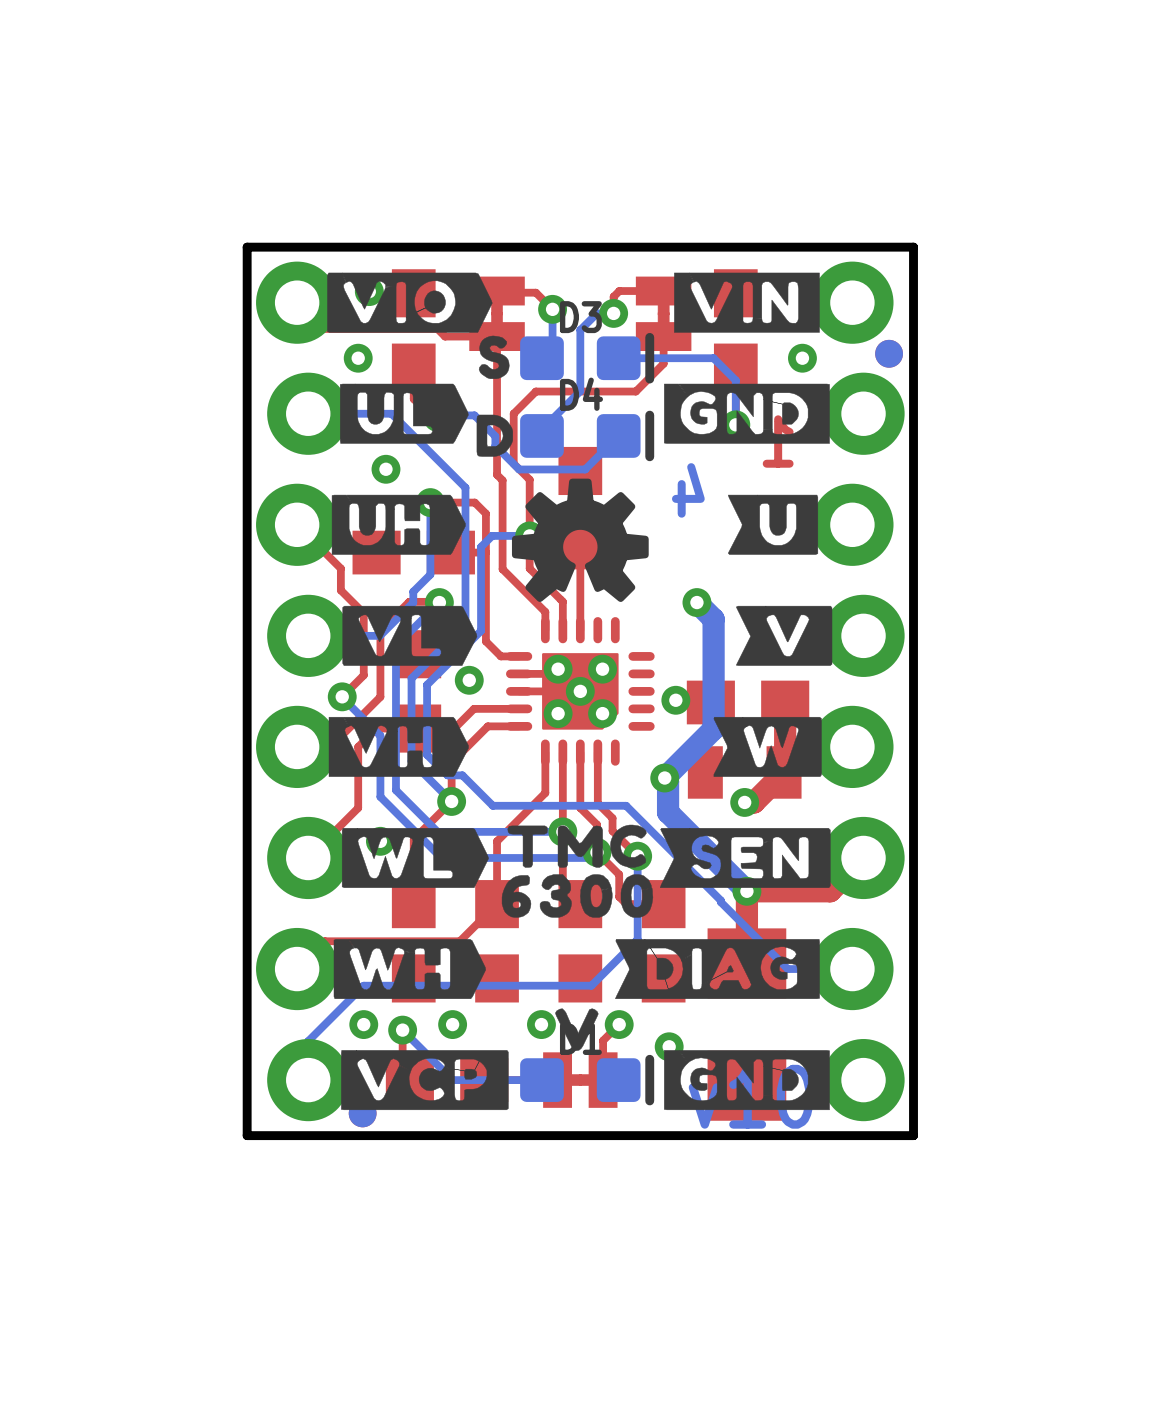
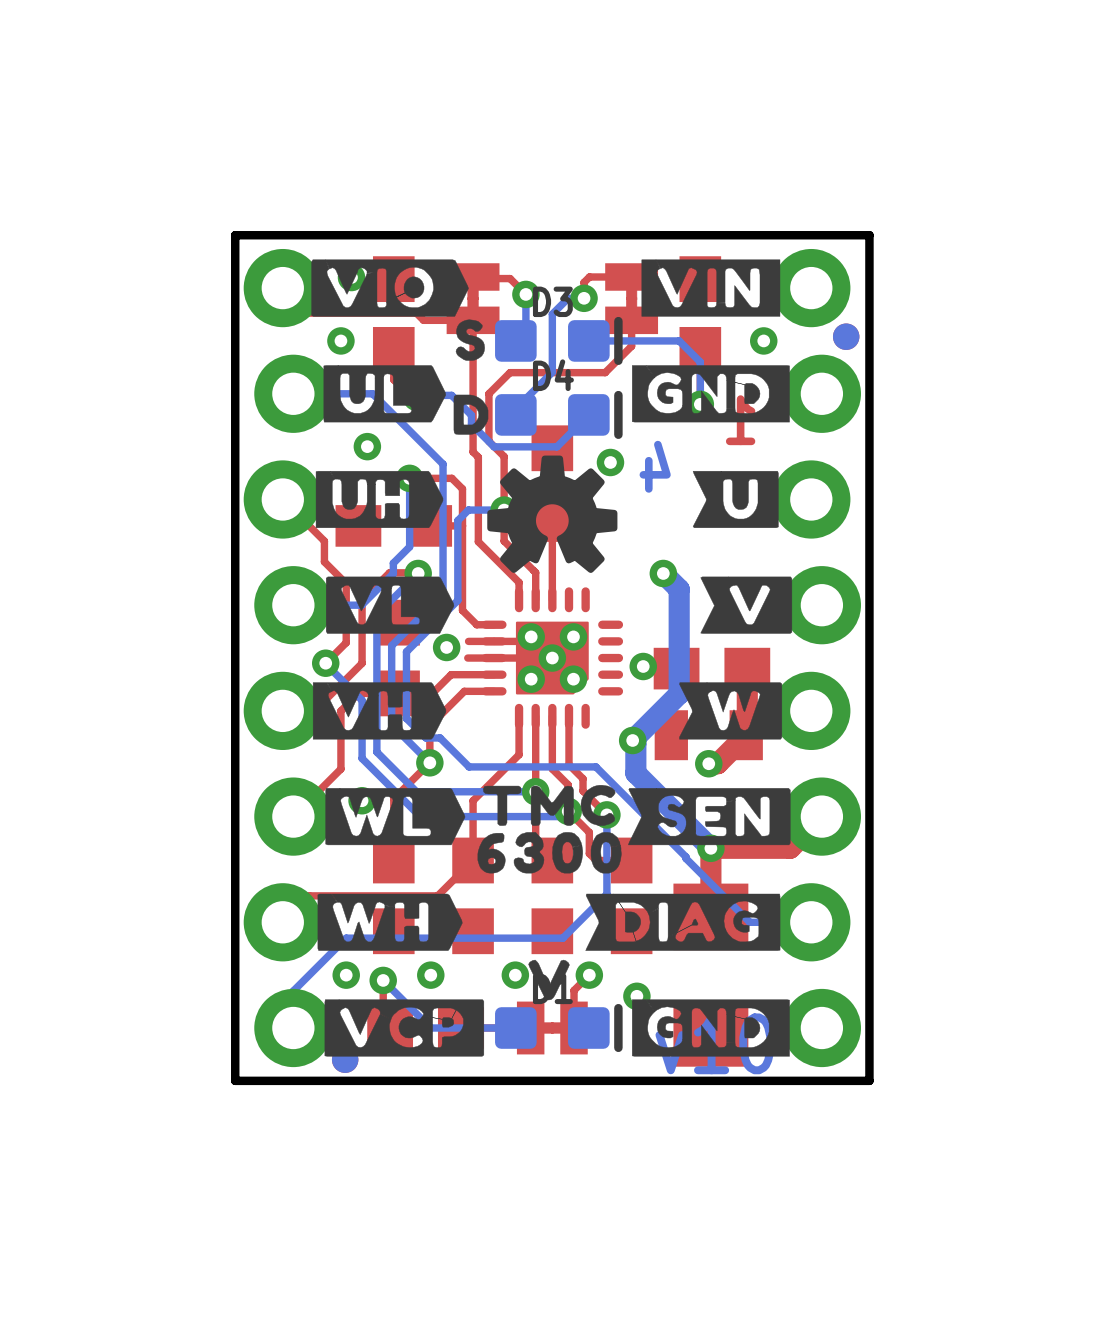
via: none -> (610, 462)
top track: none -> (494, 641) (468, 641)
top track: none -> (494, 658) (467, 658)

